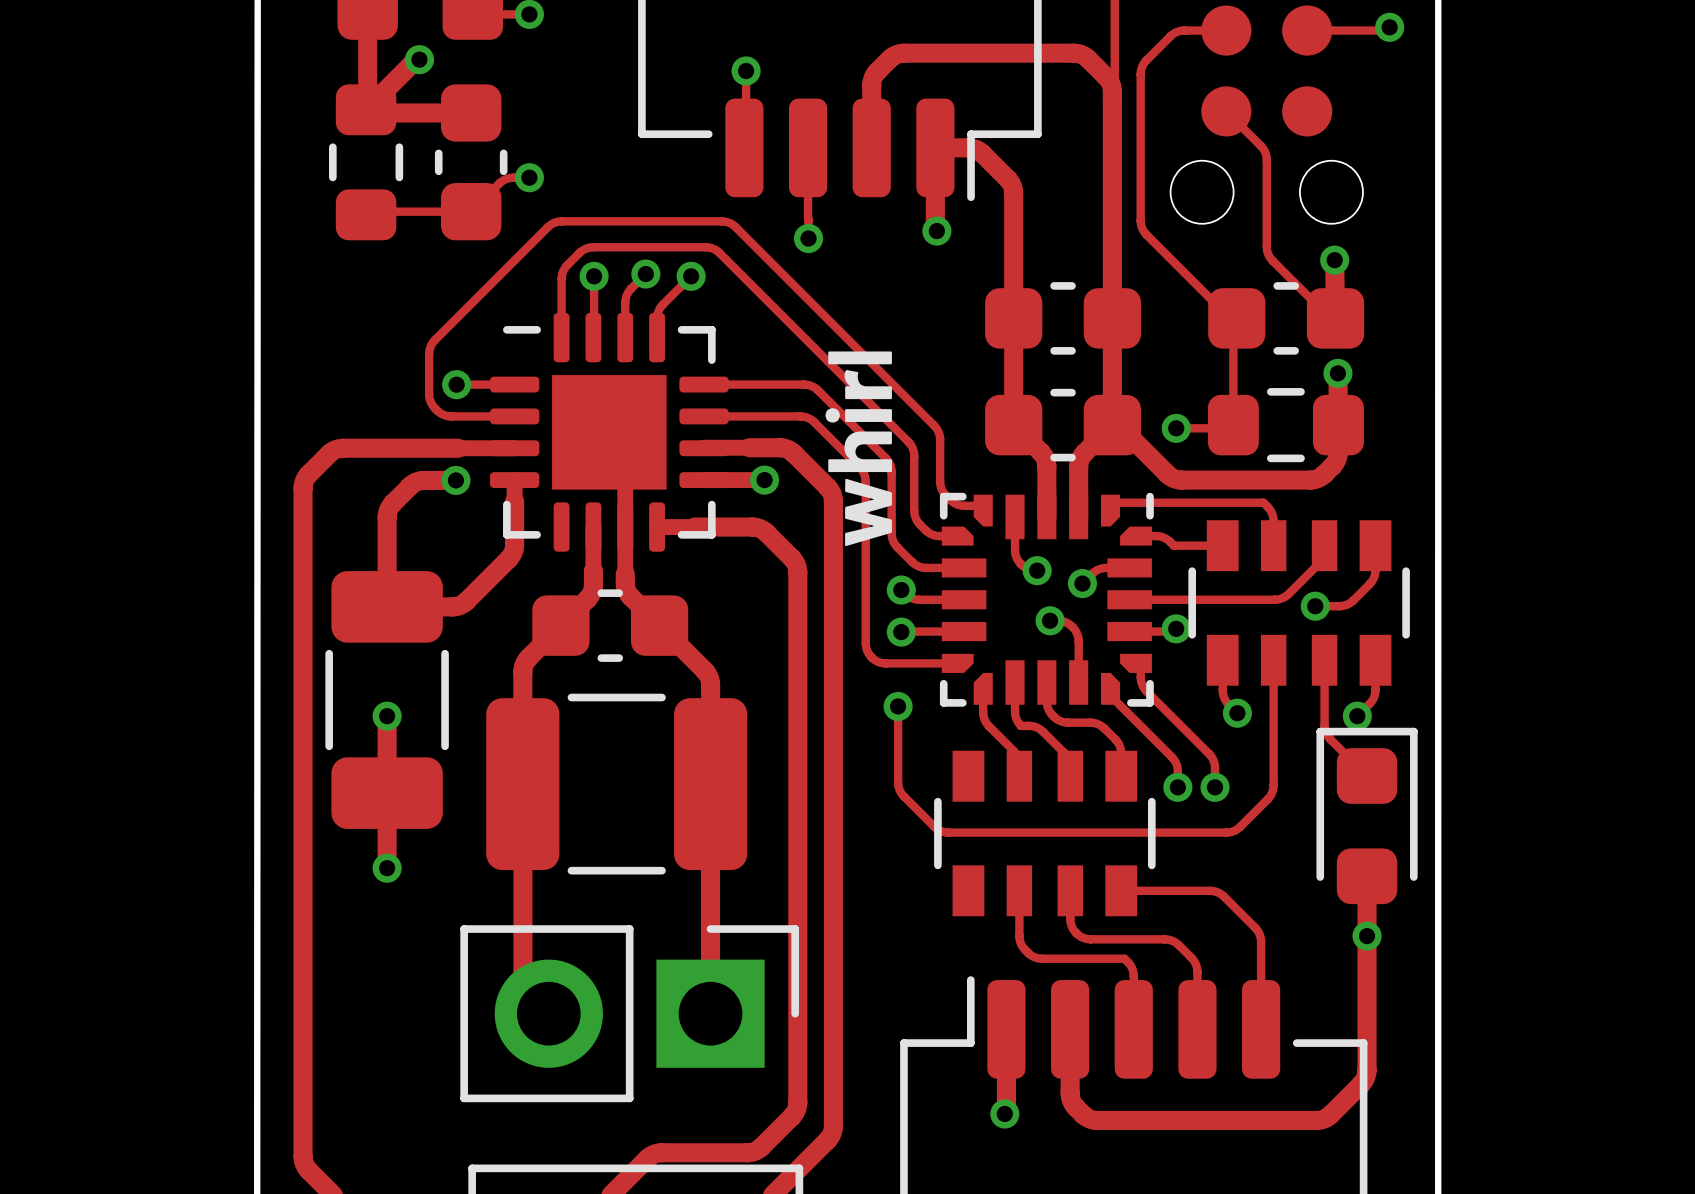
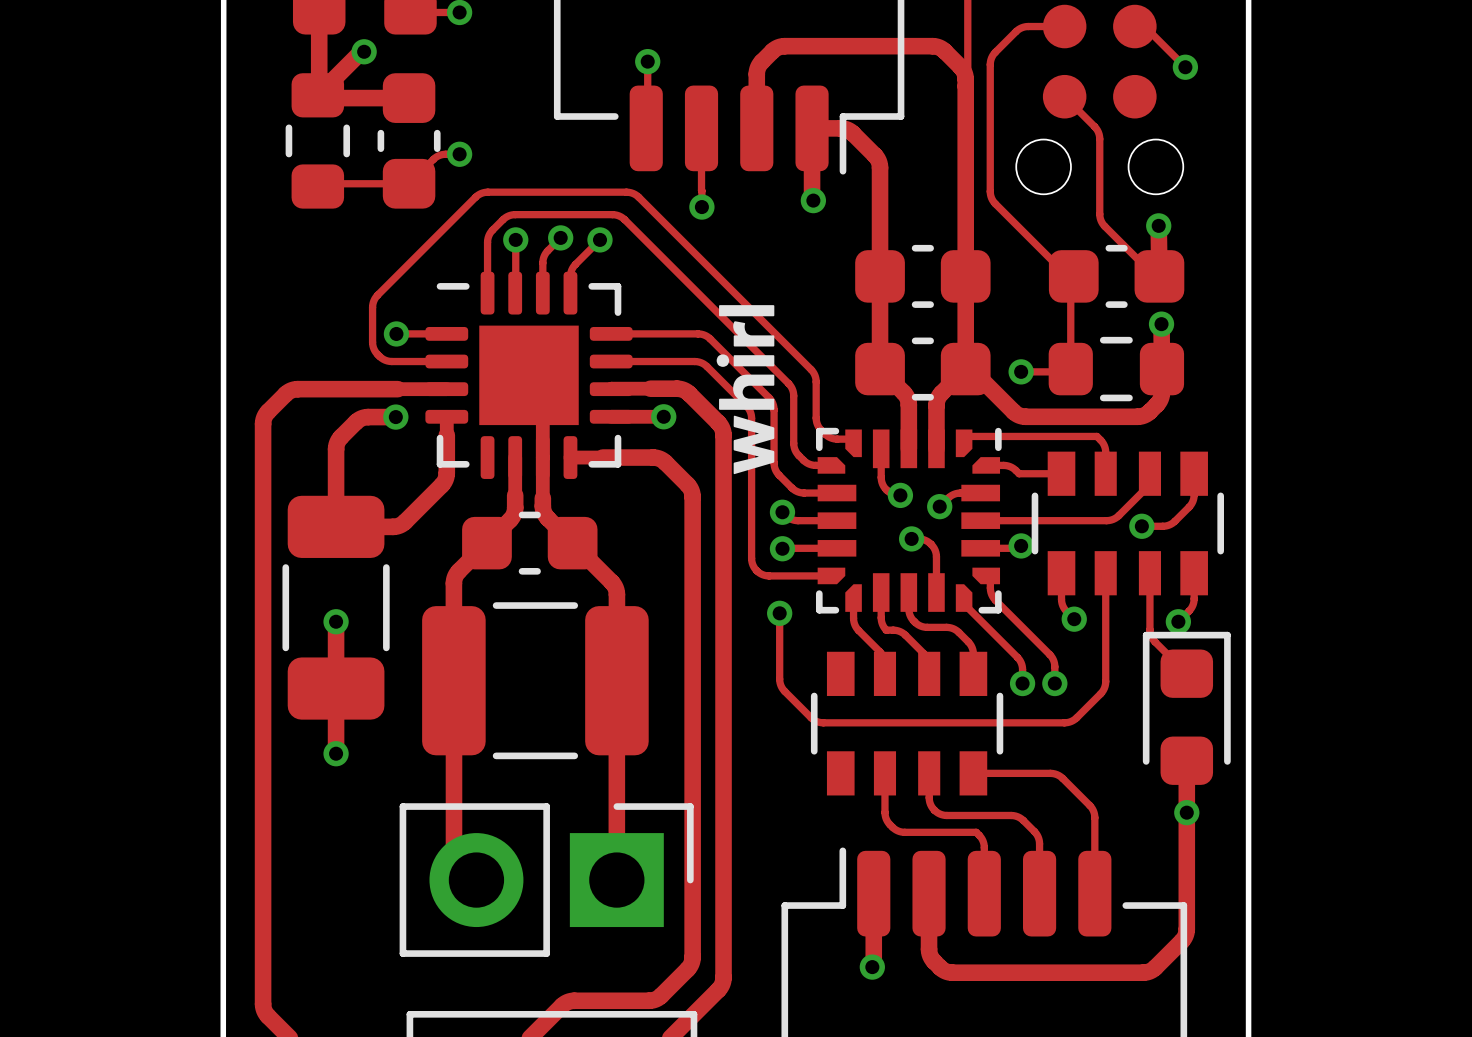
track: (1389, 27) (1386, 30) (1318, 30) -> (1185, 67) (1144, 26)
via: (1389, 27) -> none
via: none -> (1185, 67)

